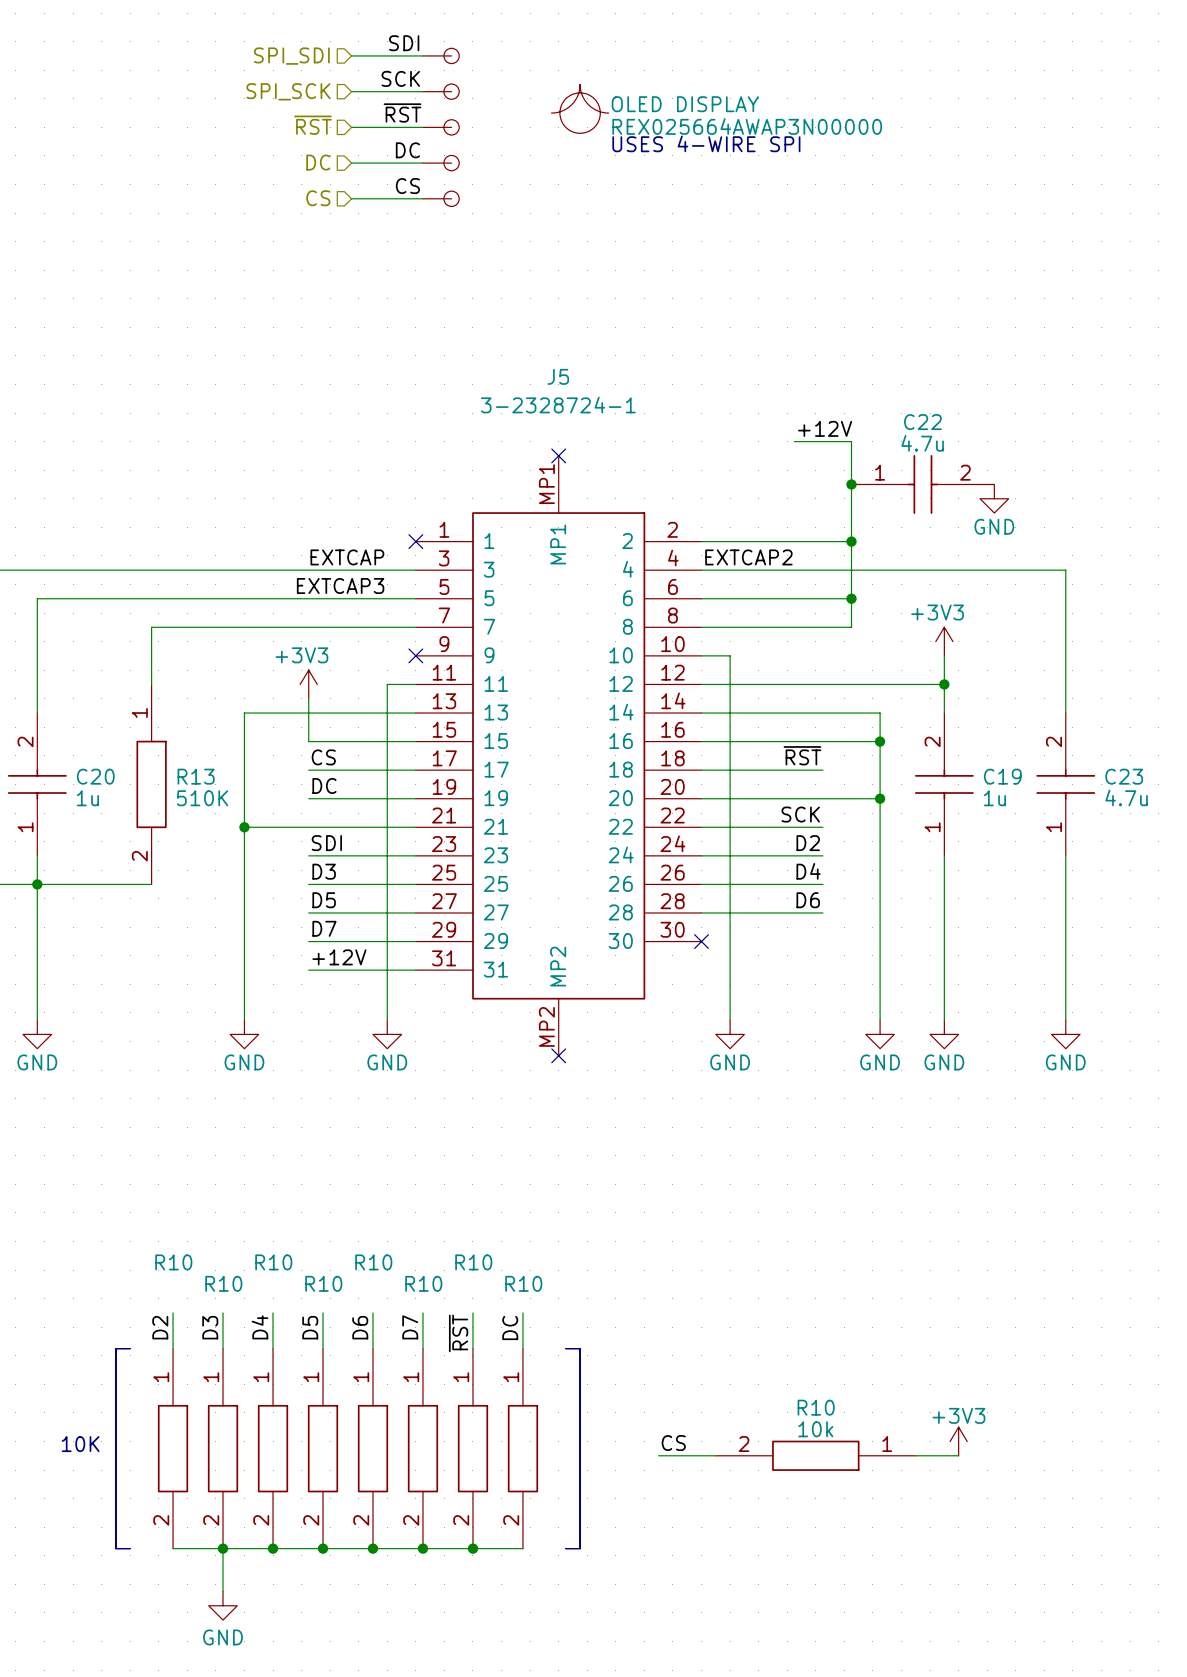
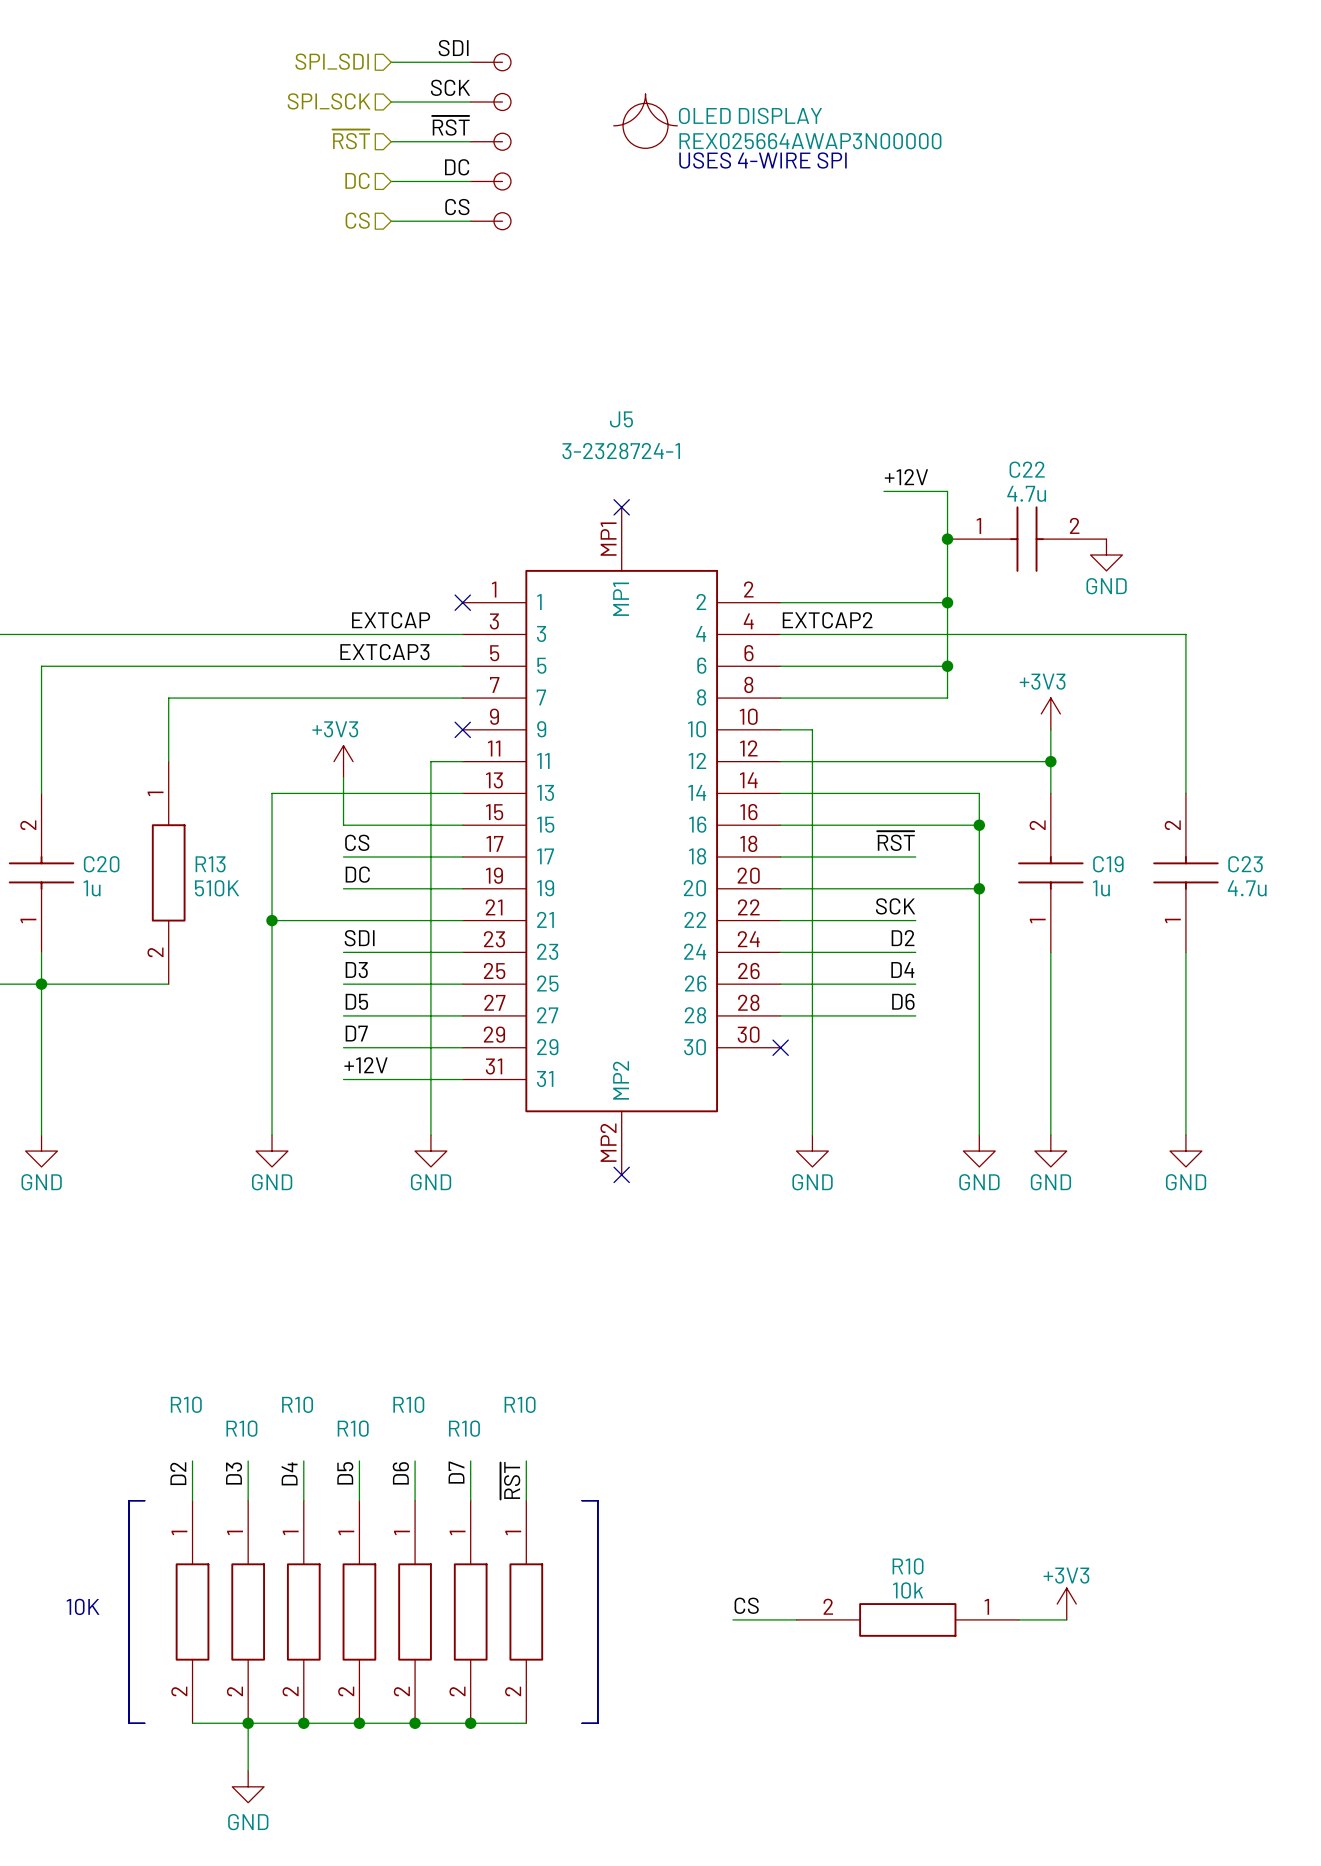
wire: (522, 1312) (522, 1348) -> none
label: DC (510, 1328) -> none
line: (565, 1348) (580, 1348) (580, 1548) (565, 1548) -> (581, 1500) (597, 1500) (597, 1723) (581, 1723)
R10: (522, 1448) -> none
wire: (472, 1548) (522, 1548) -> none
junction: (472, 1548) -> none

